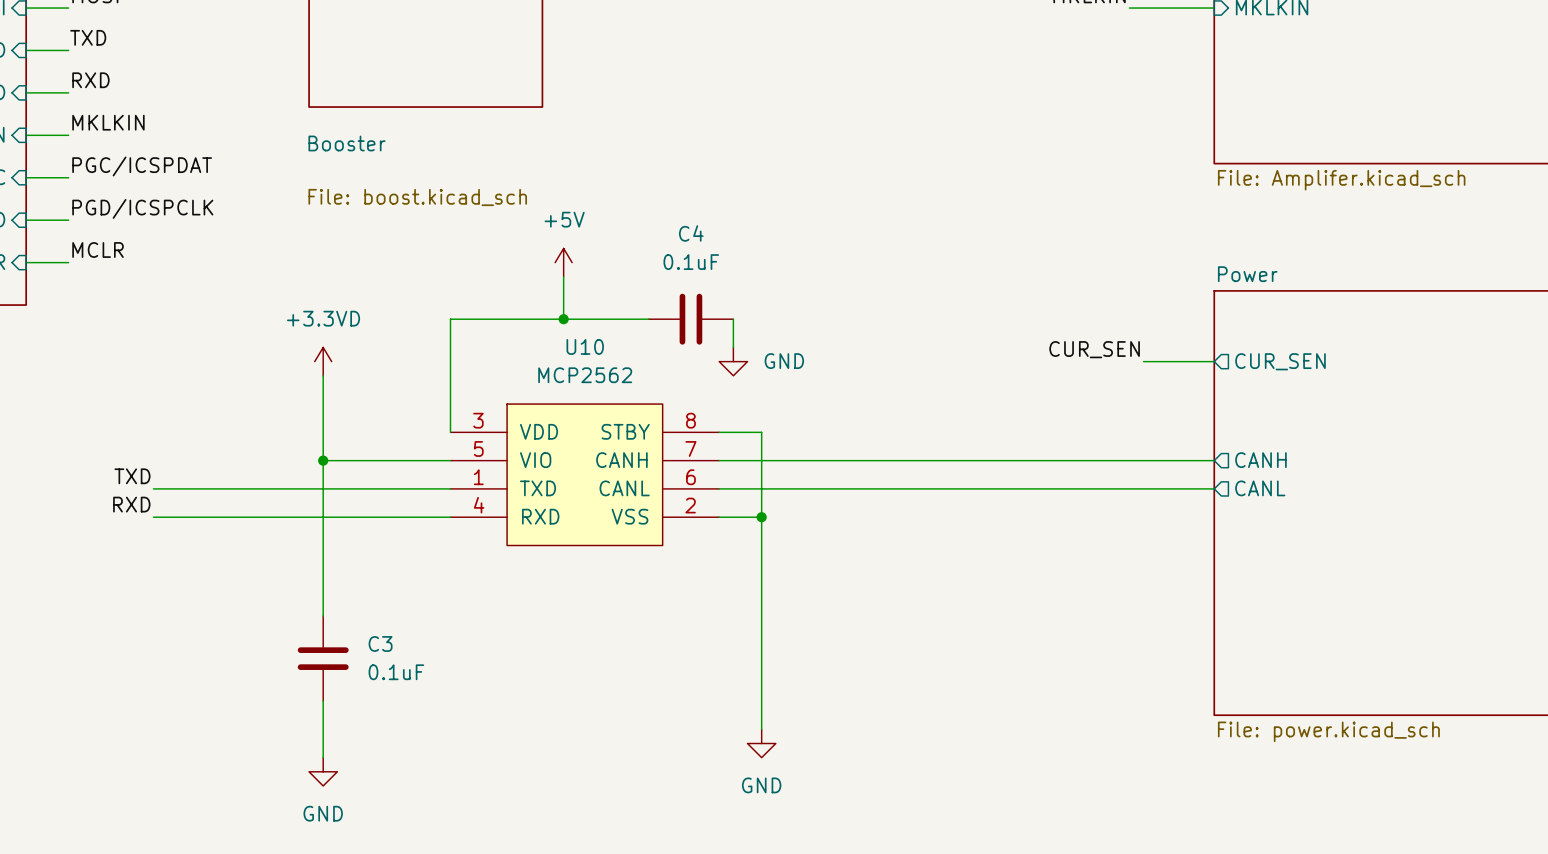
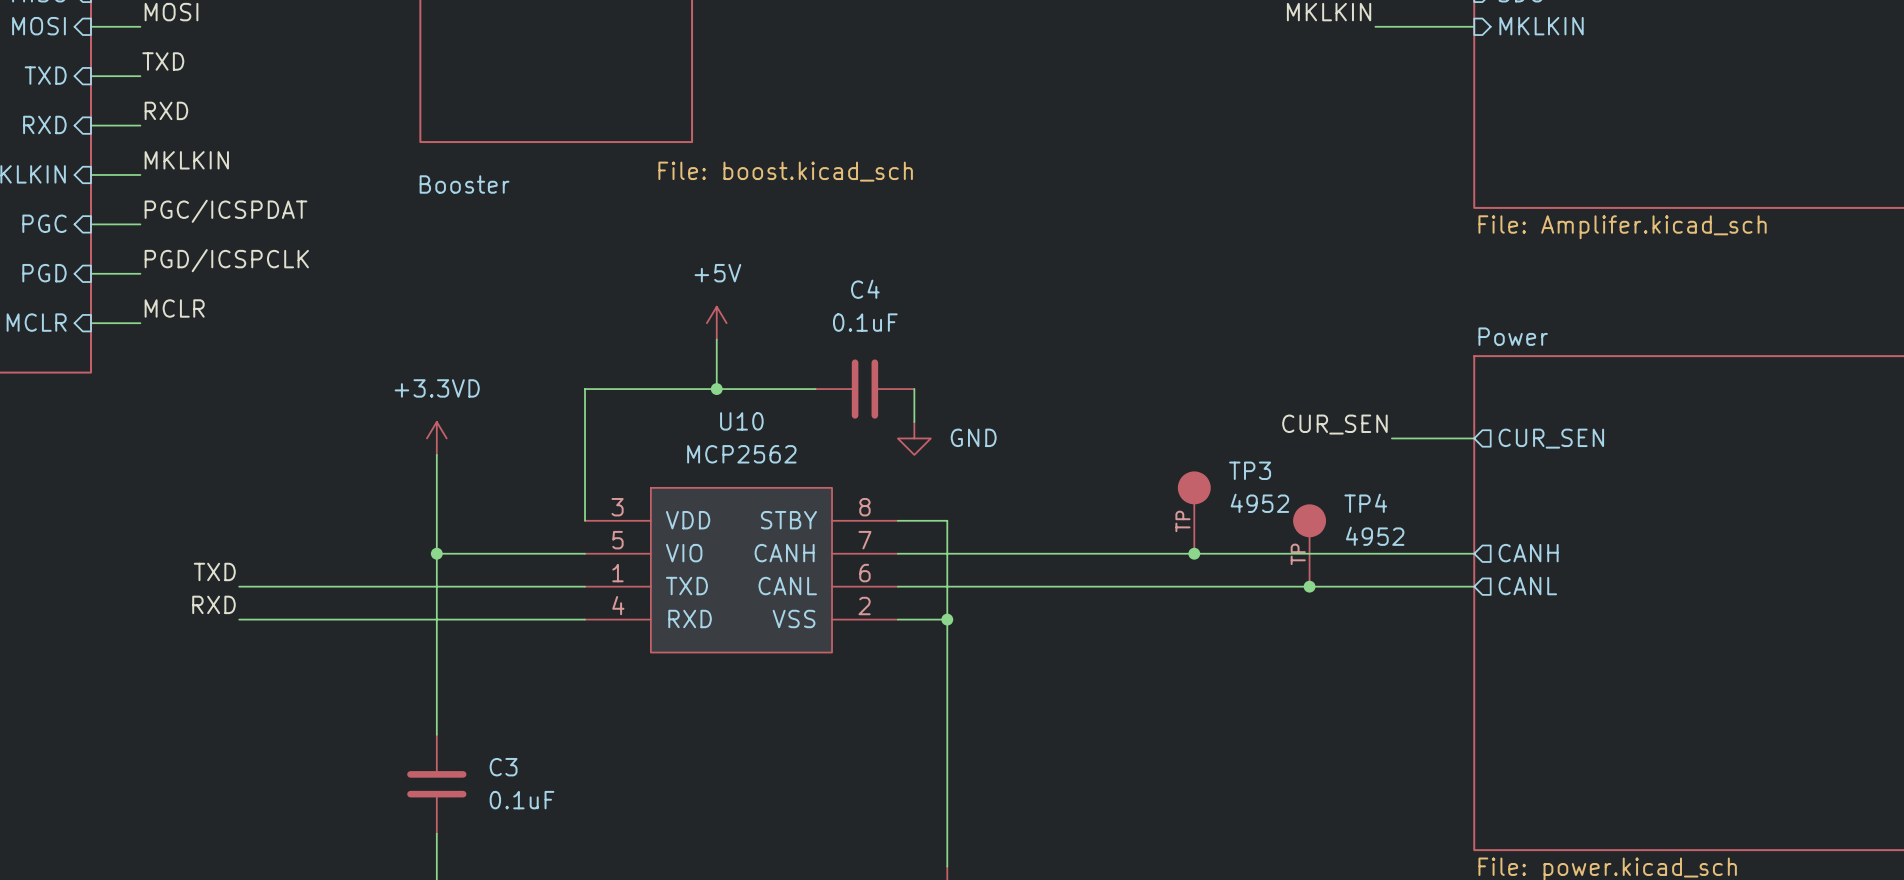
sheet Booster value position: File: boost.kicad_sch (417, 197) -> File: boost.kicad_sch (785, 171)
TP3: none -> 4952 (1194, 512)
TP4: none -> 4952 (1309, 545)
junction: none -> (1194, 553)
junction: none -> (1309, 586)

